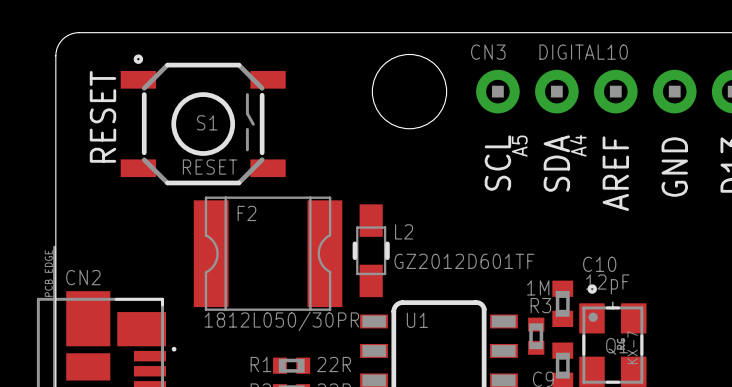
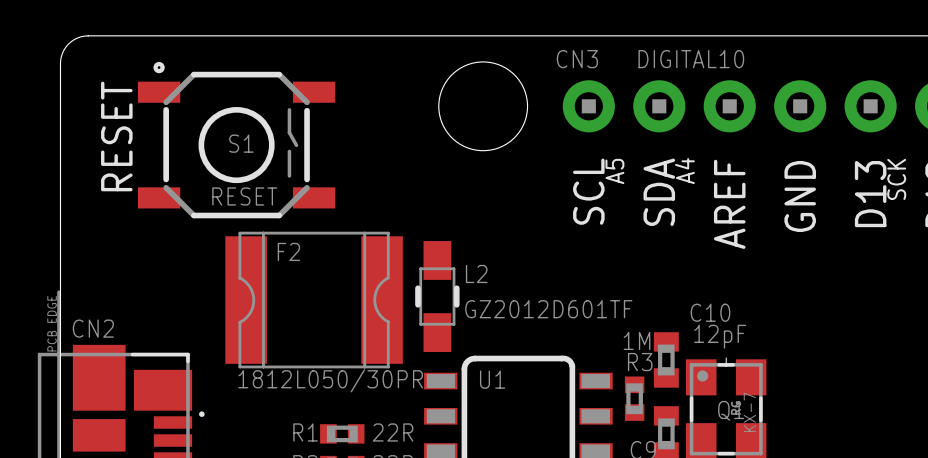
drawing: [587, 284, 597, 294] -> none

